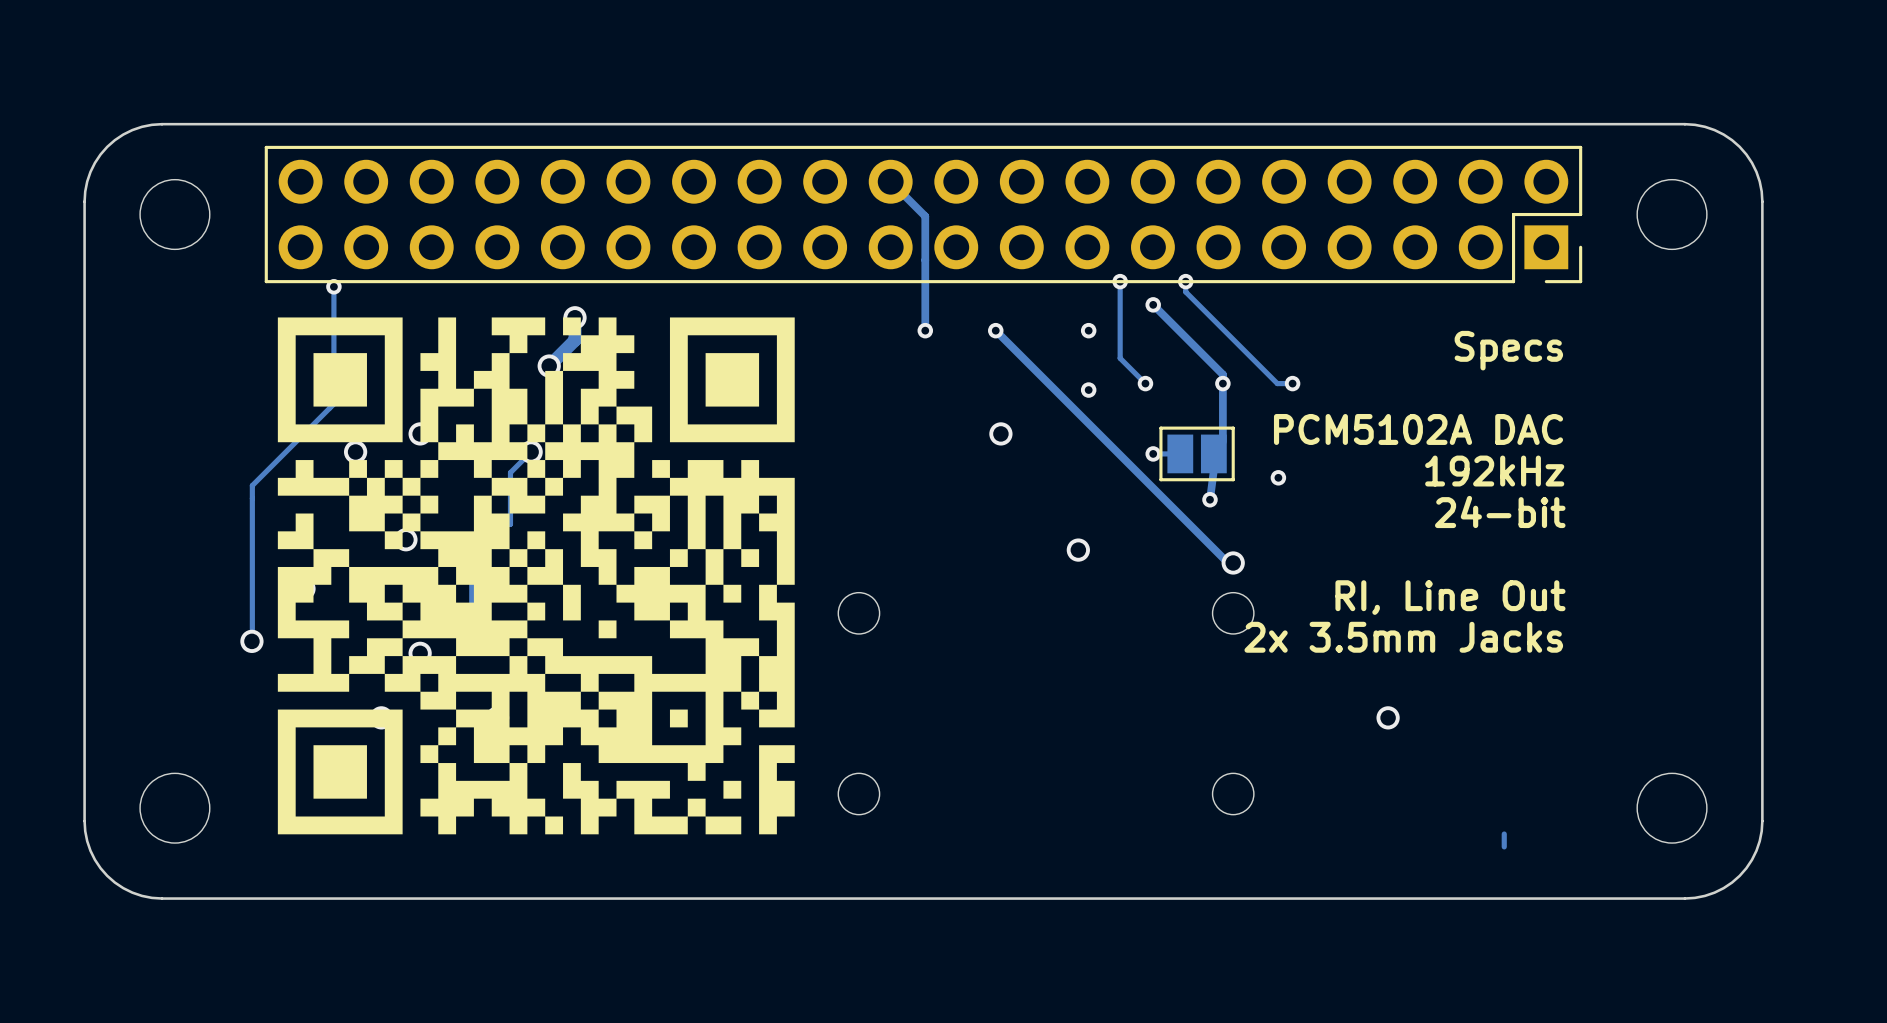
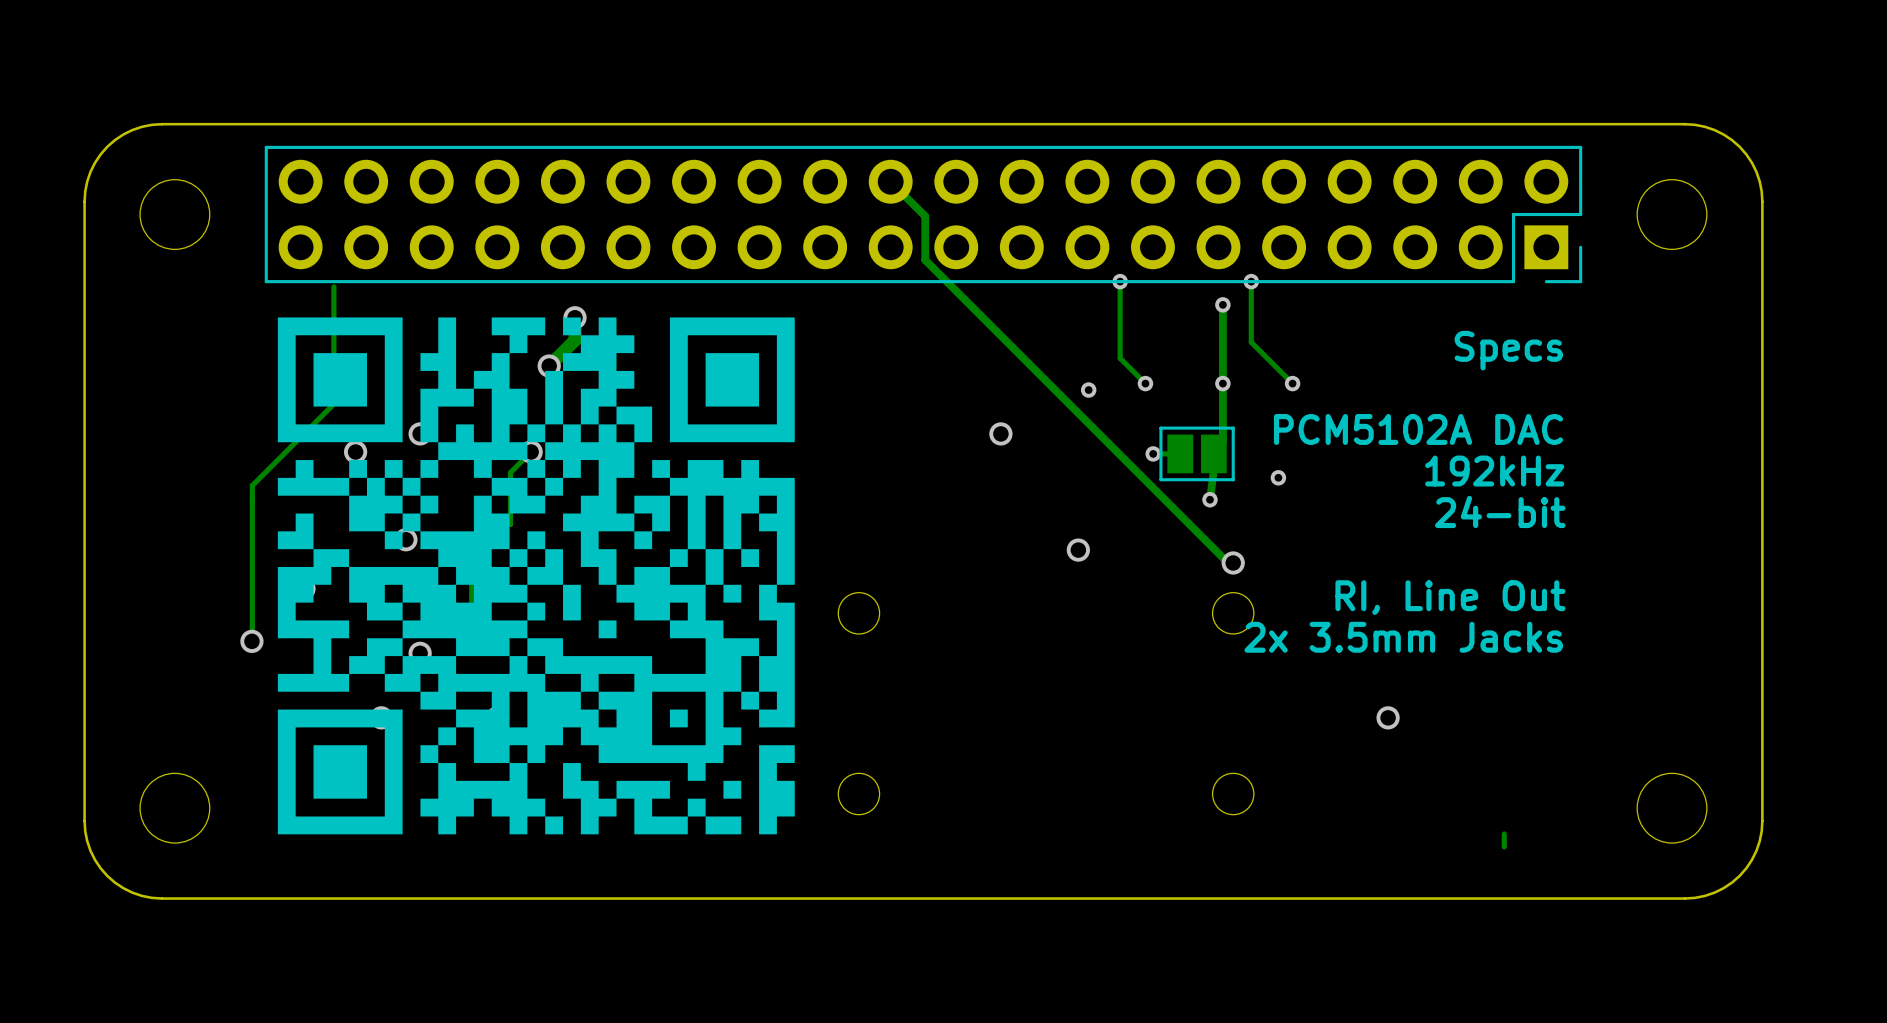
track: (925, 260) (925, 330) -> none
track: (1185, 281) (1185, 291) (1277, 383) (1292, 383) -> (1251, 281) (1251, 342) (1292, 383)
via: (1185, 281) -> none
via: none -> (1251, 281)
via: (333, 286) -> none
track: (1153, 304) (1222, 374) -> (1222, 304) (1222, 374)
via: (1153, 304) -> none
via: none -> (1222, 304)
via: (925, 330) -> none
track: (995, 330) (1228, 562) -> (925, 260) (1228, 562)
via: (995, 330) -> none
via: (1088, 330) -> none

